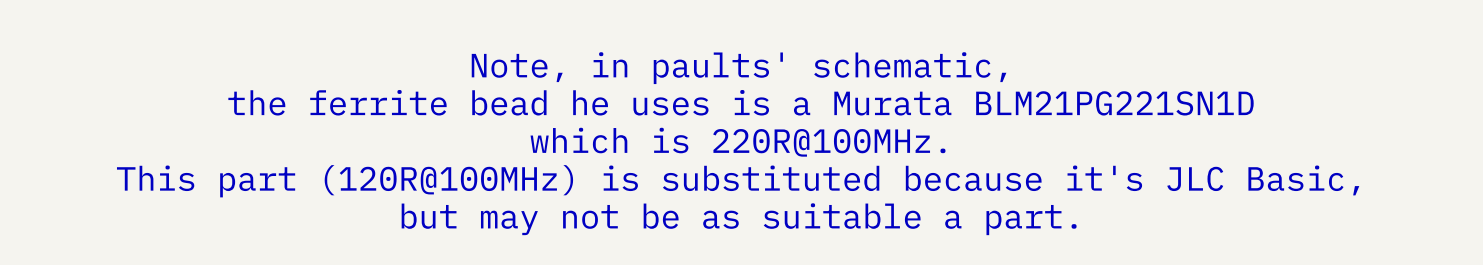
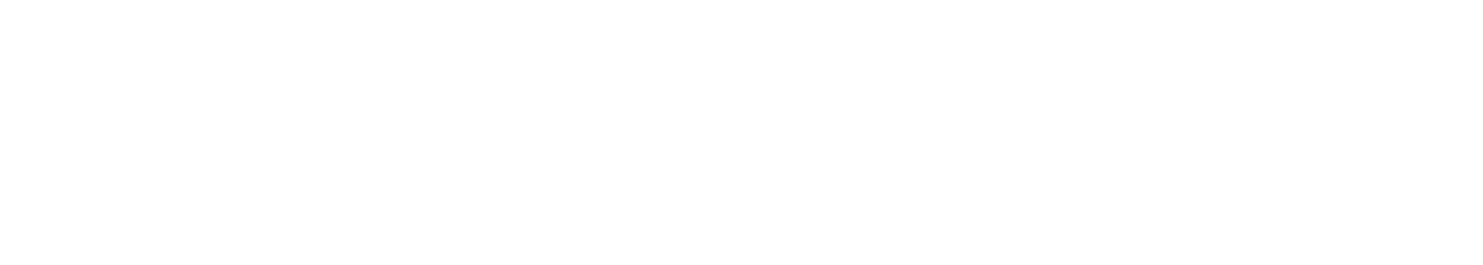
text: Note, in paults' schematic, (739, 68) -> none
text: the ferrite bead he uses is a Murata BLM21PG221SN1D (741, 102) -> none
text: which is 220R@100MHz. (738, 142) -> none
text: This part (120R@100MHz) is substituted because it's JLC Basic, (738, 181) -> none
text: but may not be as suitable a part. (739, 219) -> none

